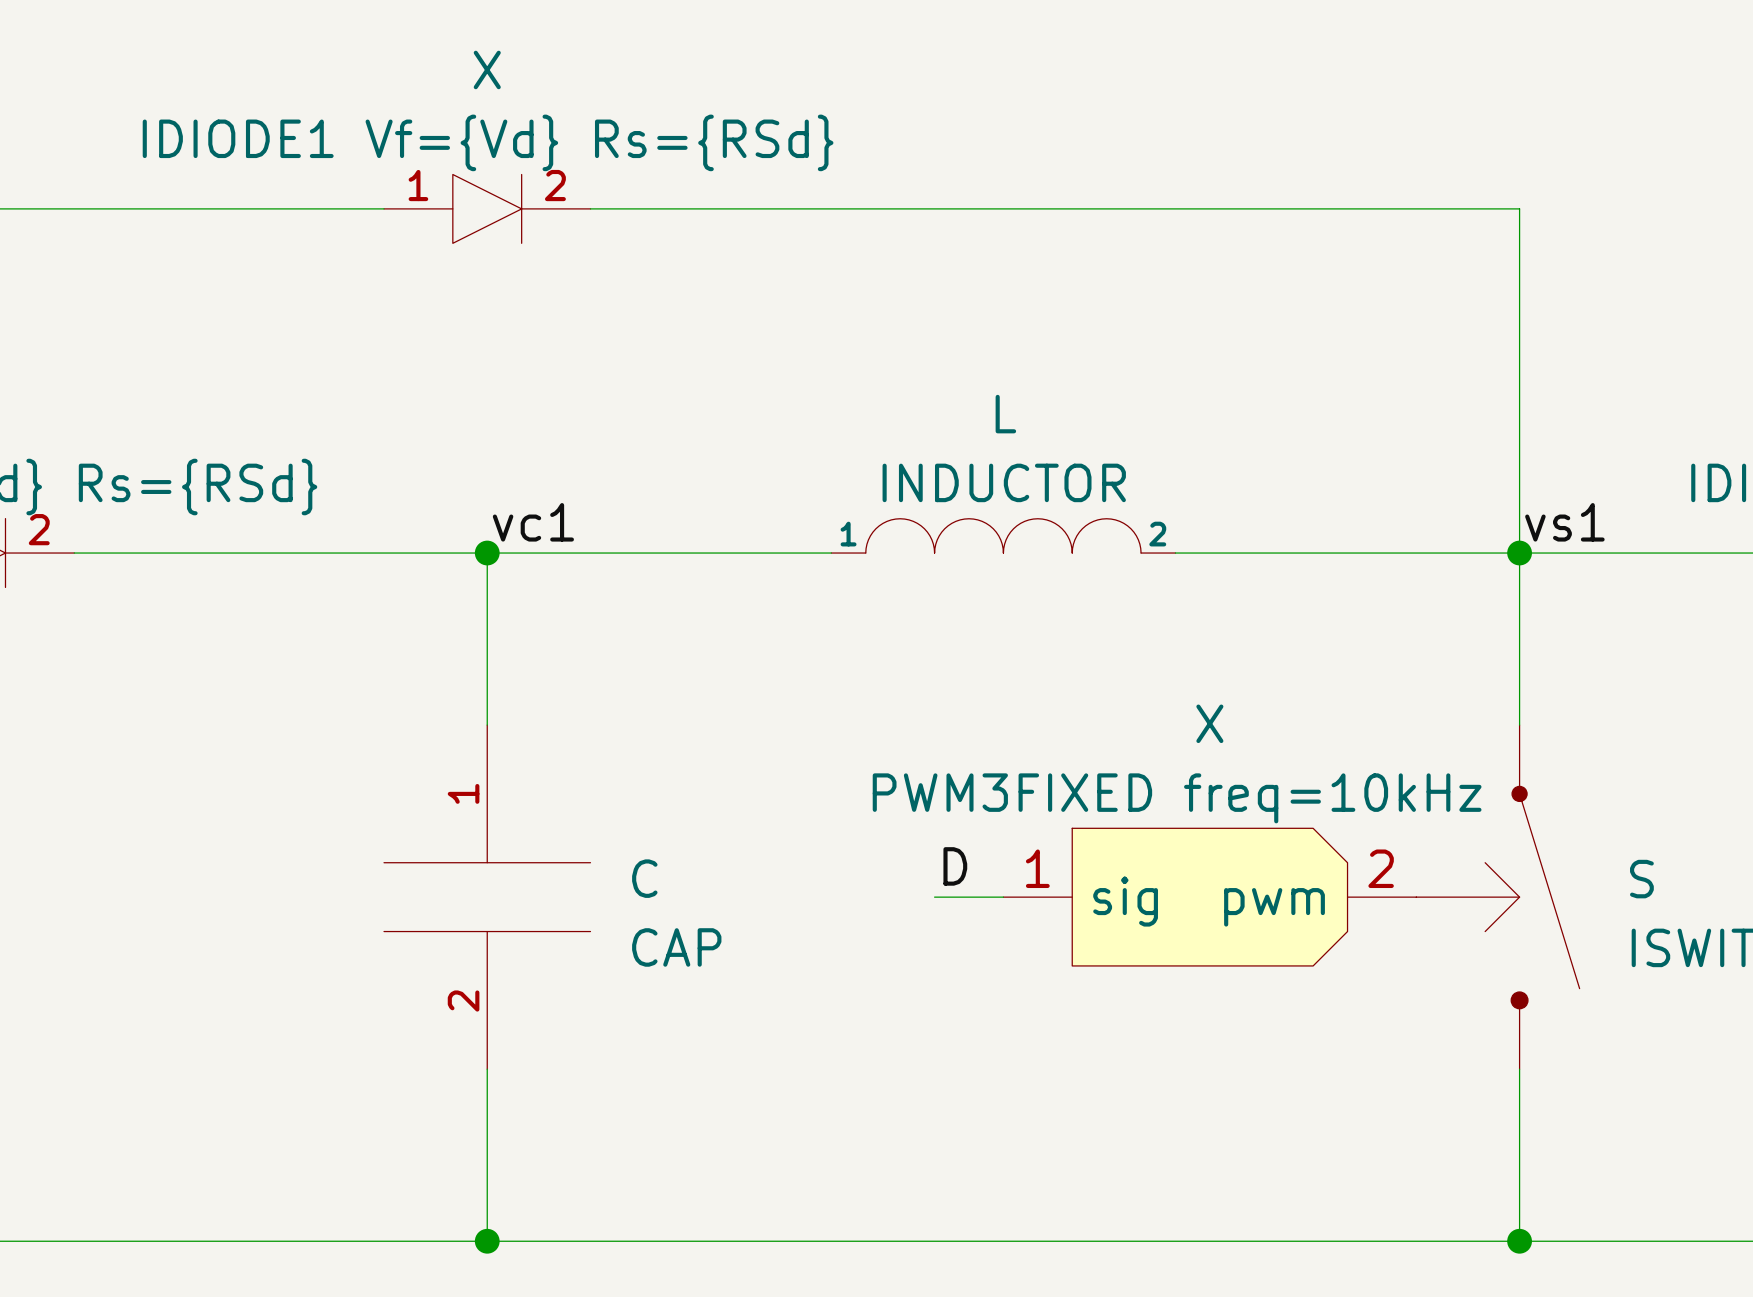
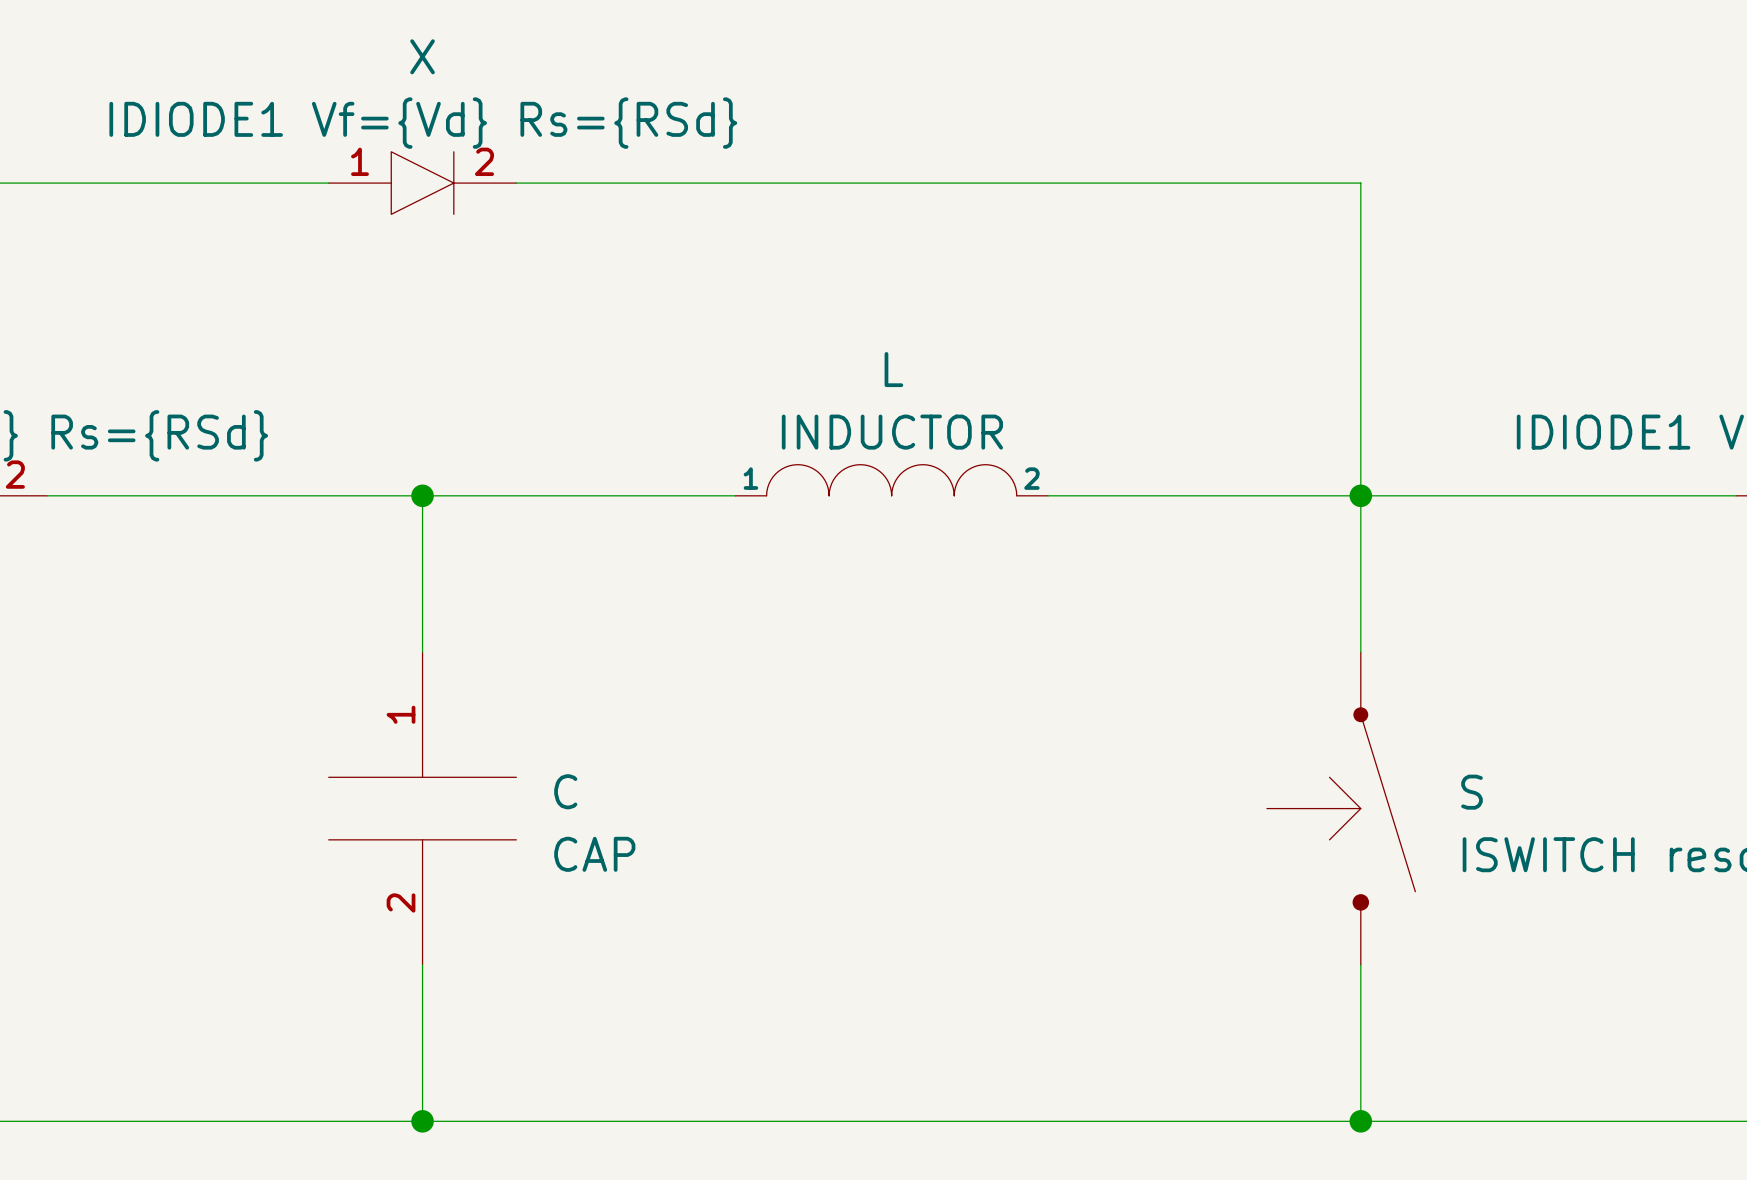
label: vc1 (533, 522) -> none
label: vs1 (1564, 522) -> none
label: D (955, 866) -> none
wire: (934, 897) (1003, 897) -> none
X: (1209, 897) -> none

